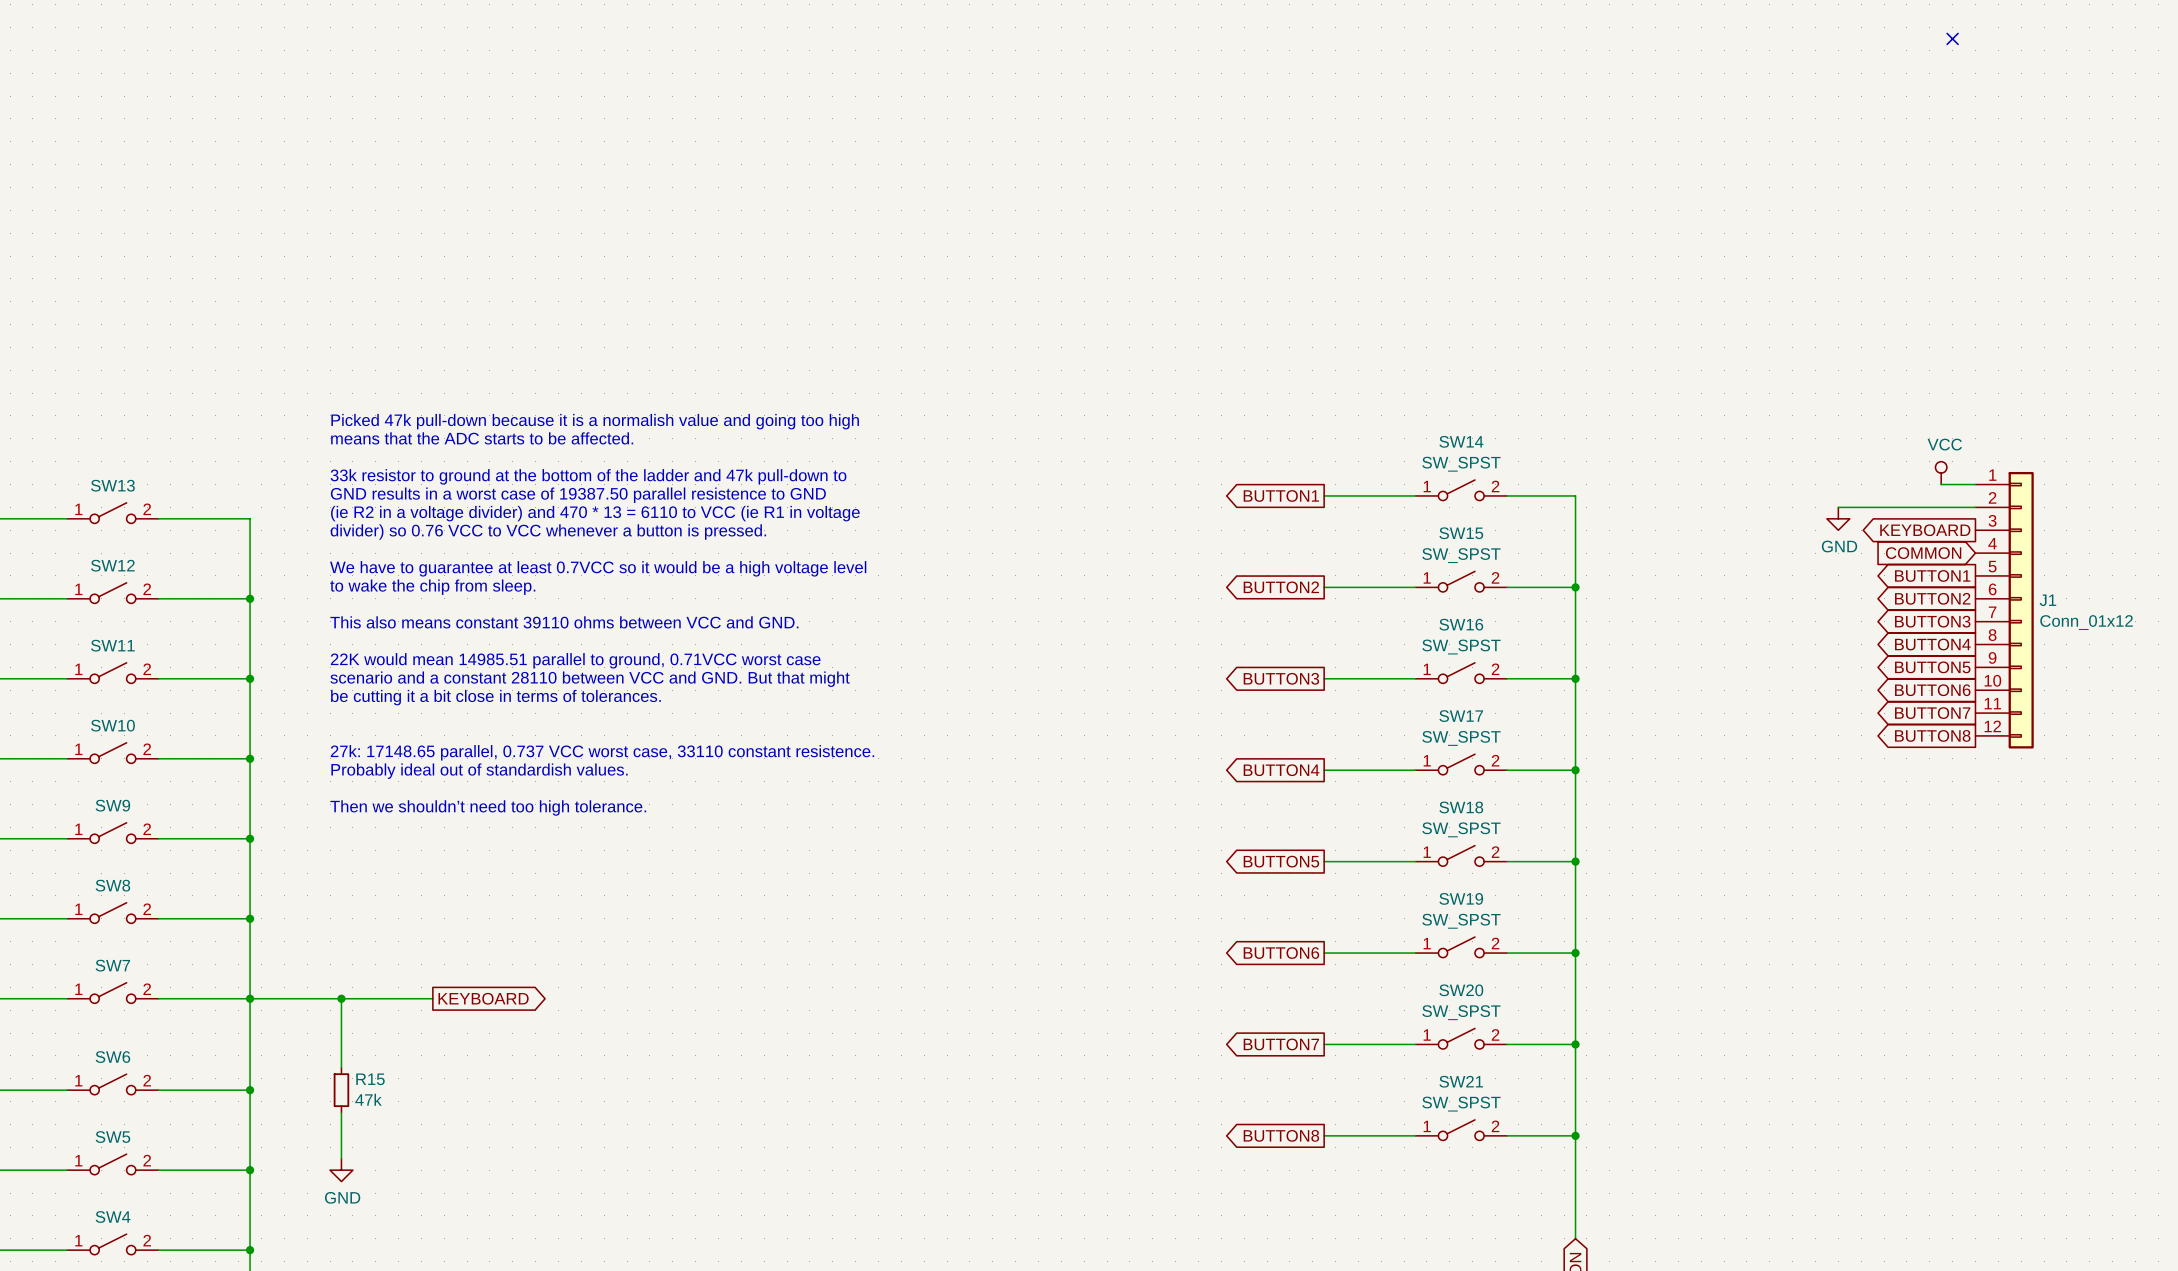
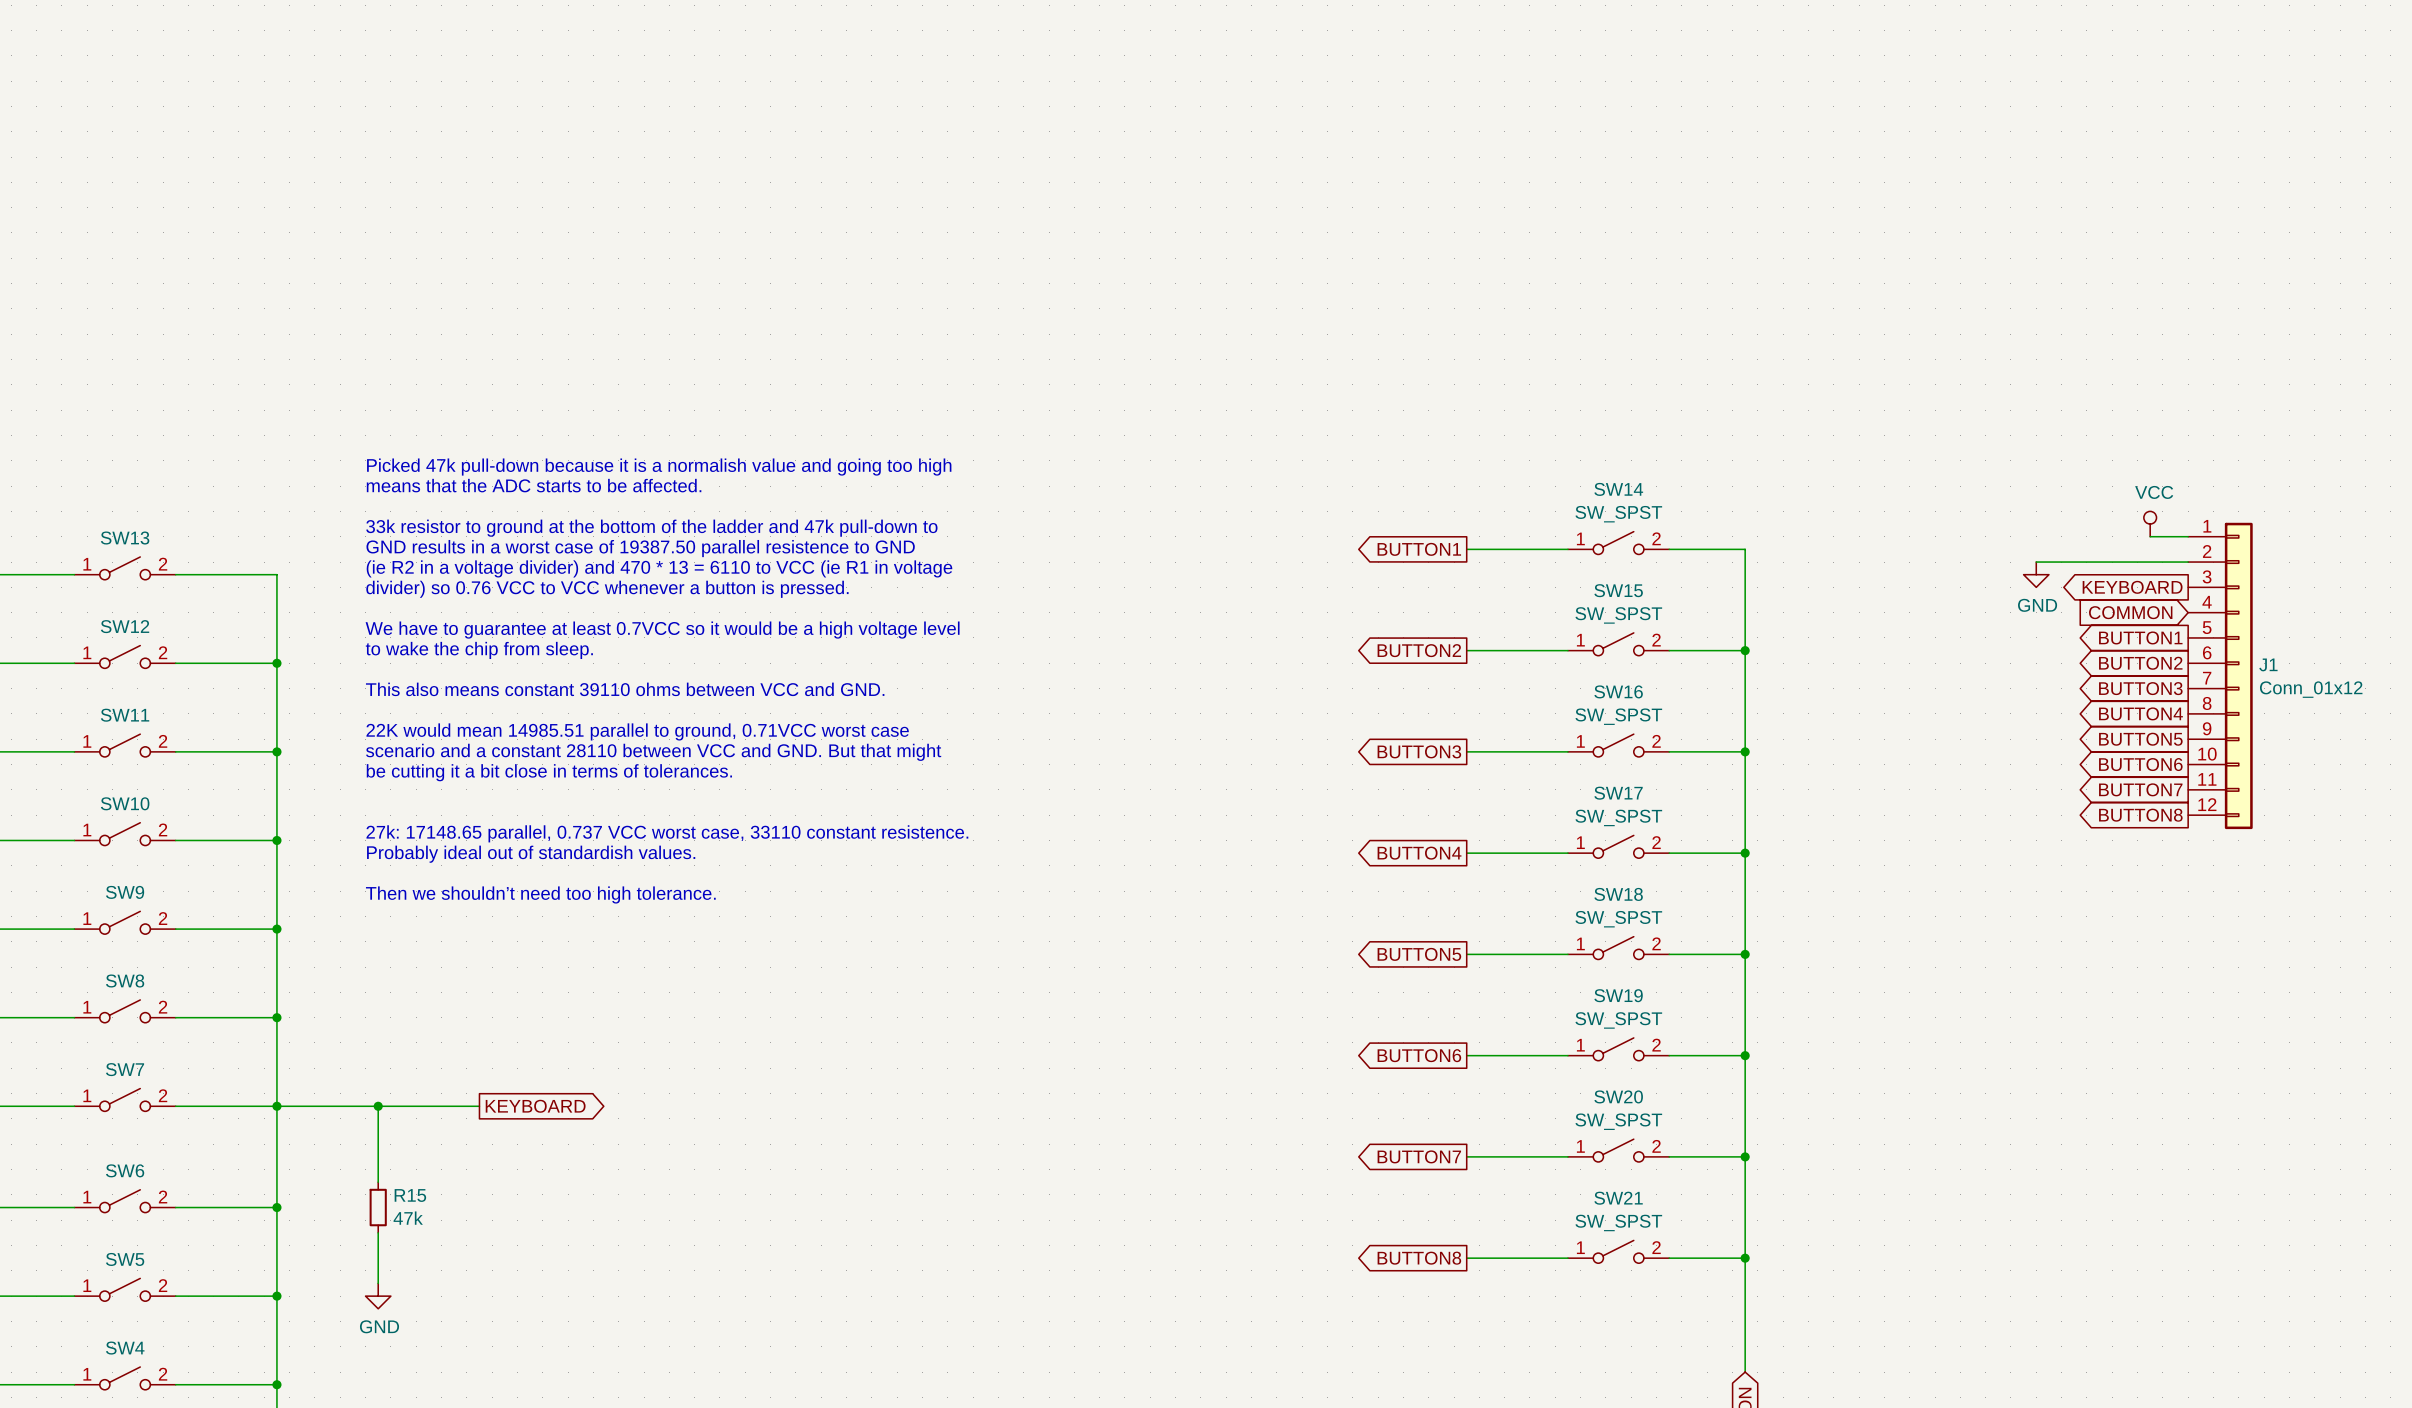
no-connect mark: (1952, 38) -> none

